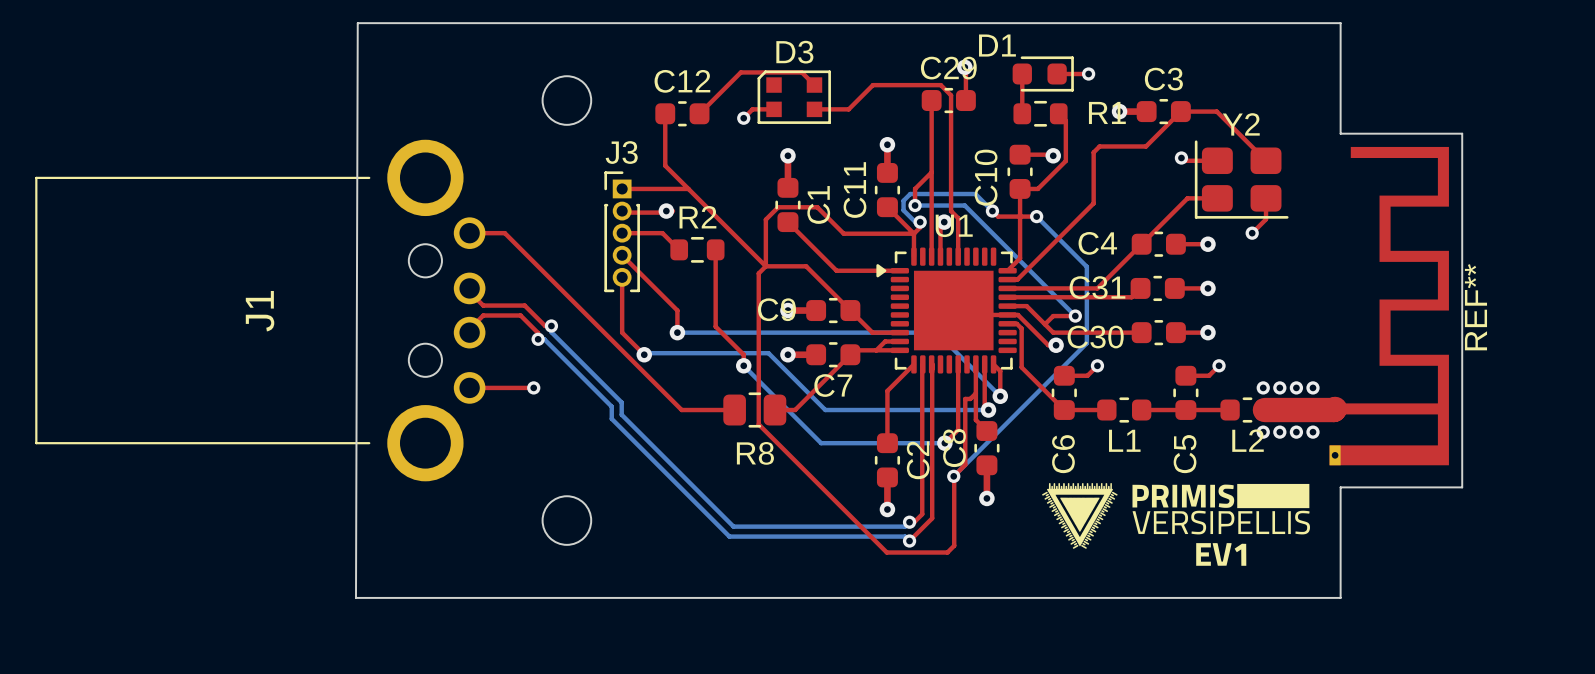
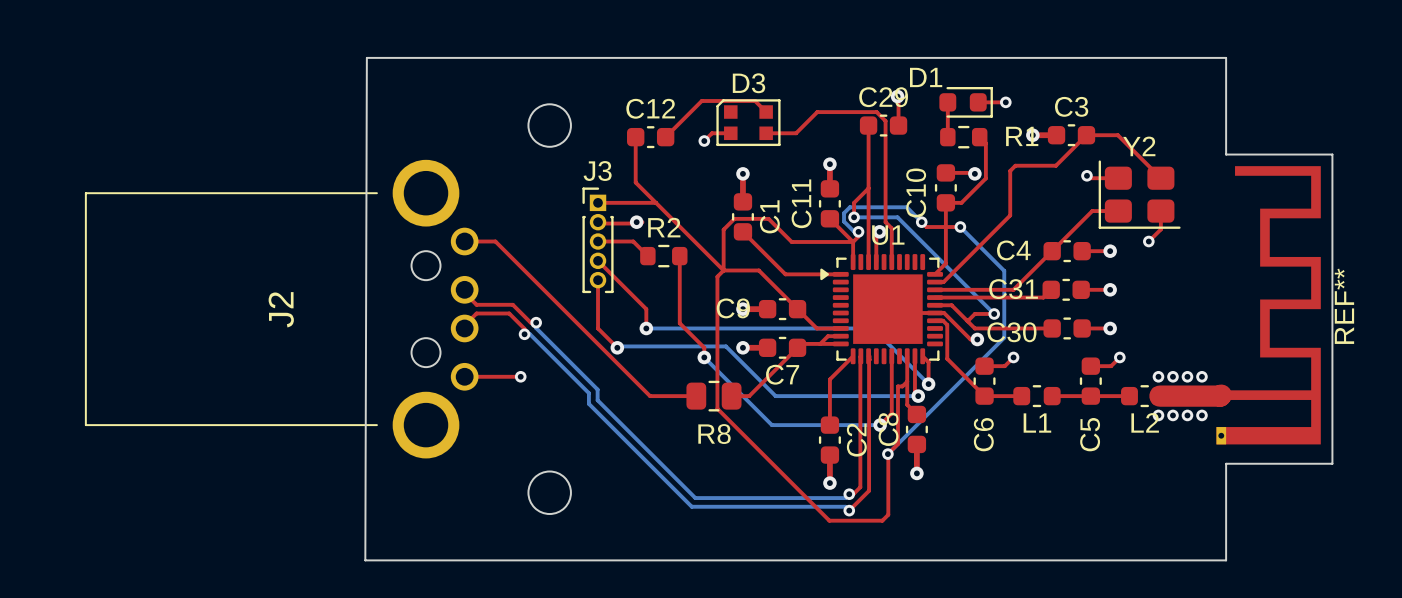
J1 name: J1 (260, 311) -> J2 (281, 309)
drawing: [1042, 483, 1310, 566] -> none

